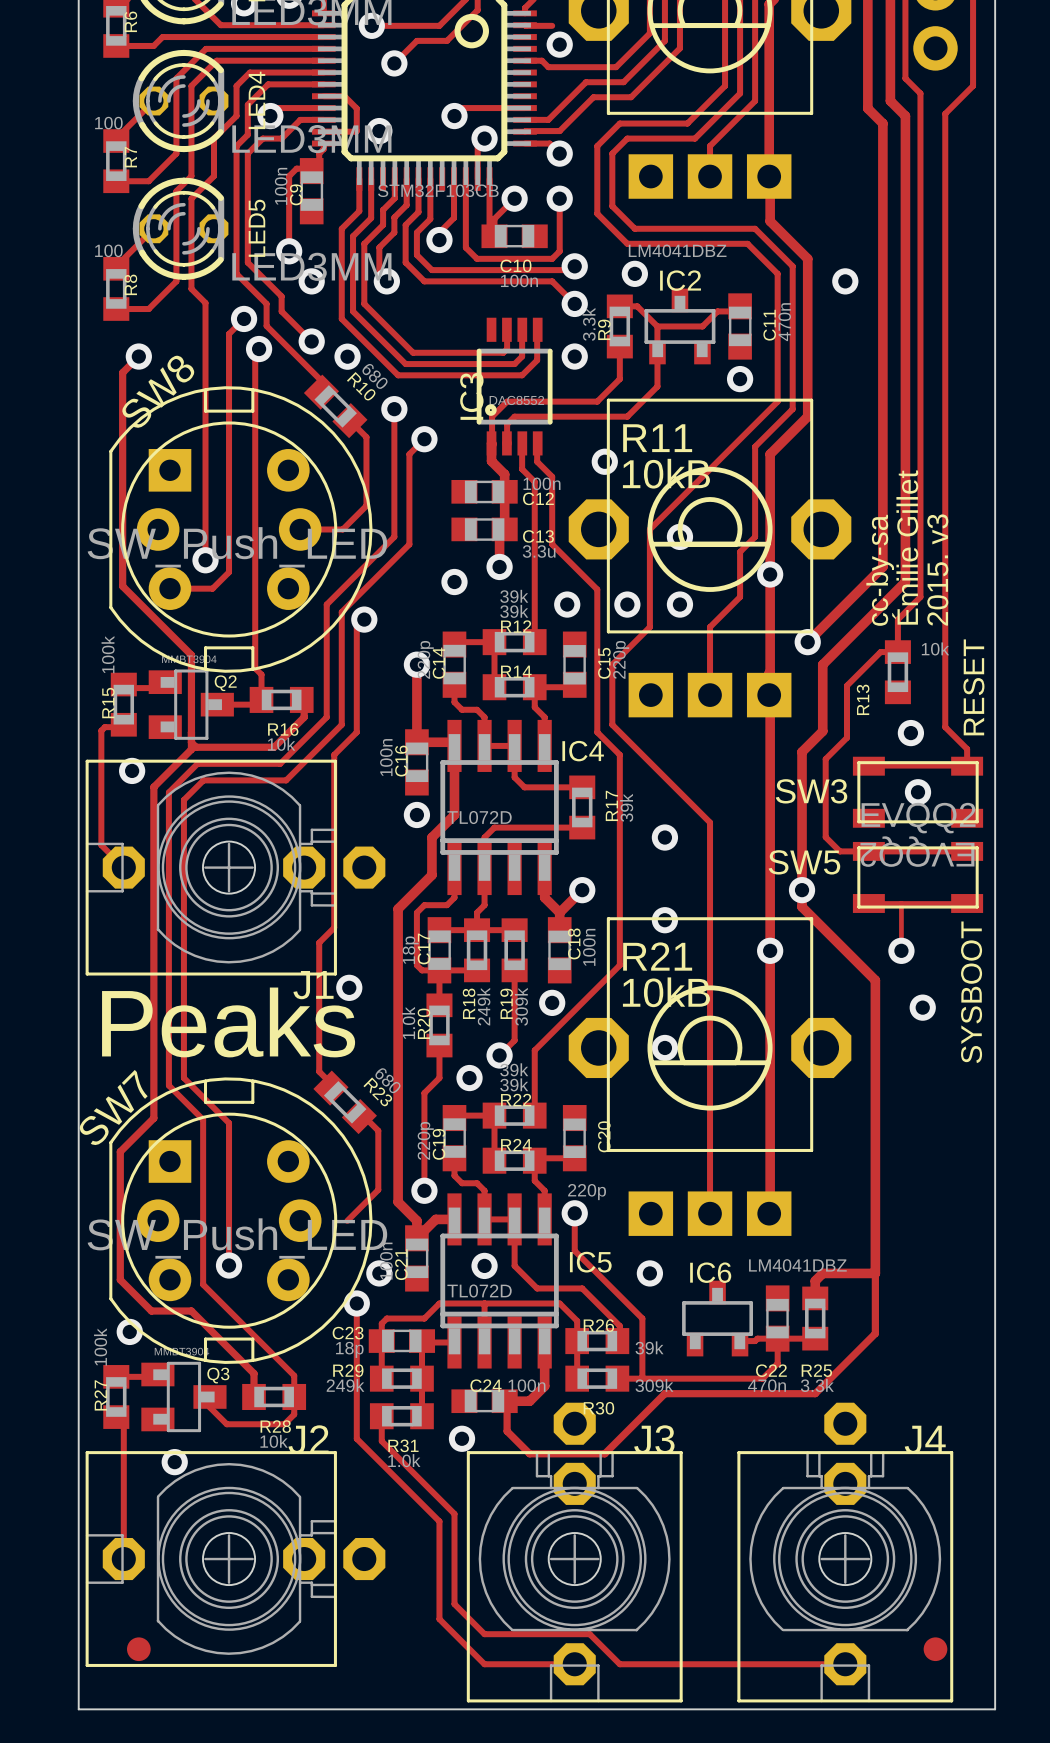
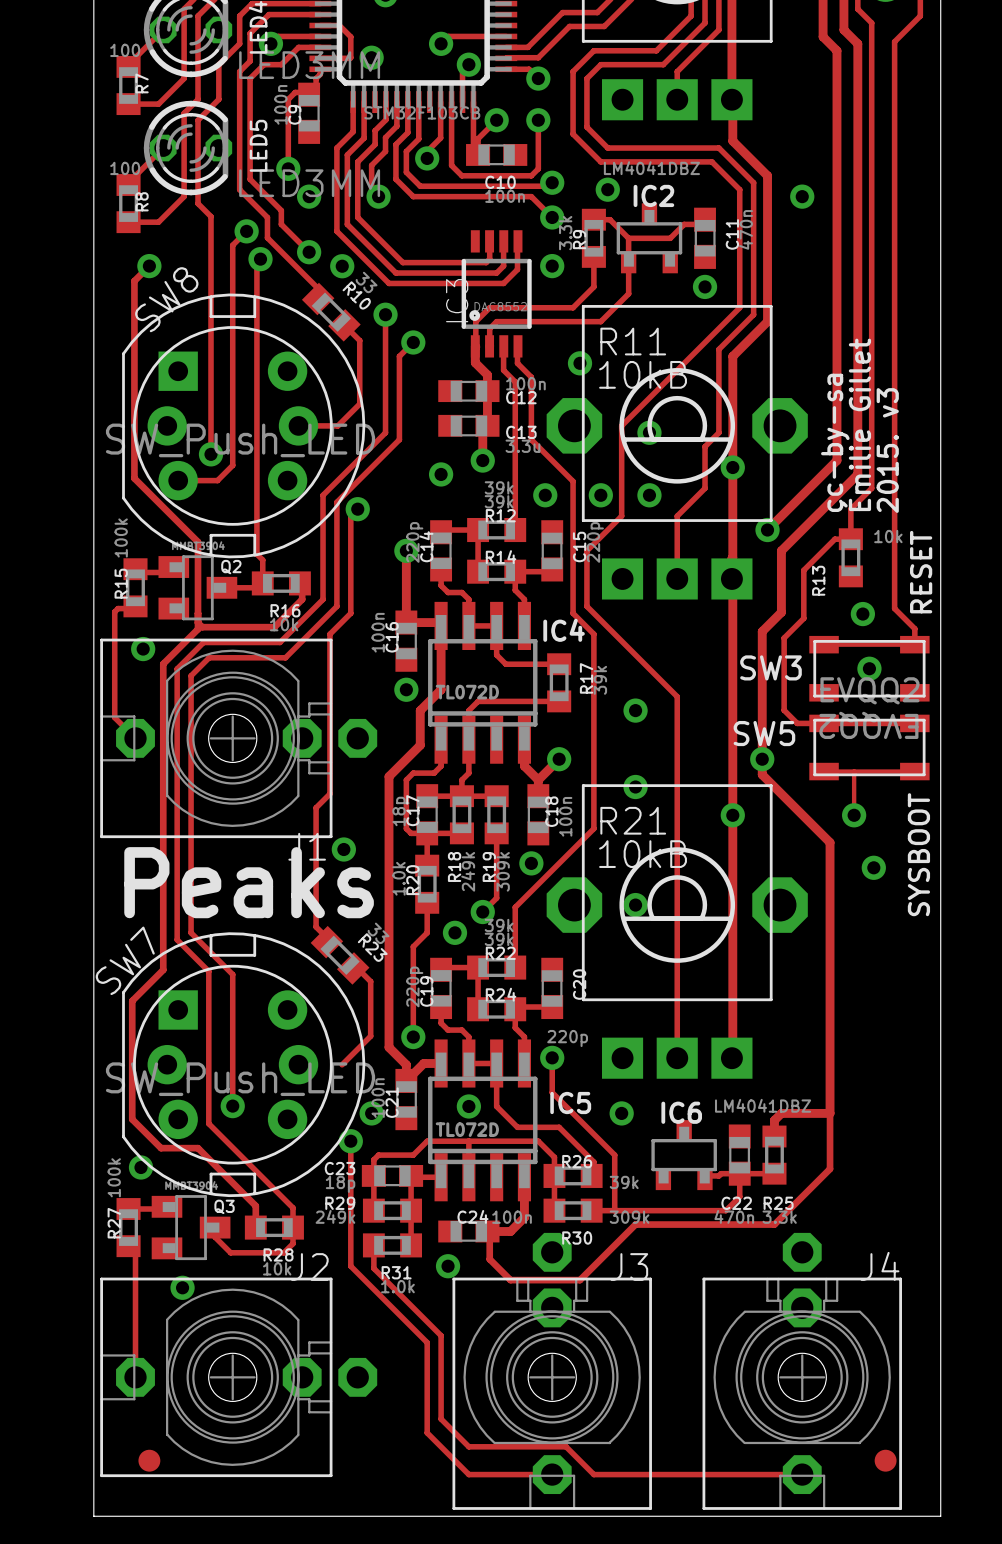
R10 value: 680 (375, 376) -> 33 (366, 282)
R23 value: 680 (387, 1080) -> 33 (378, 933)

